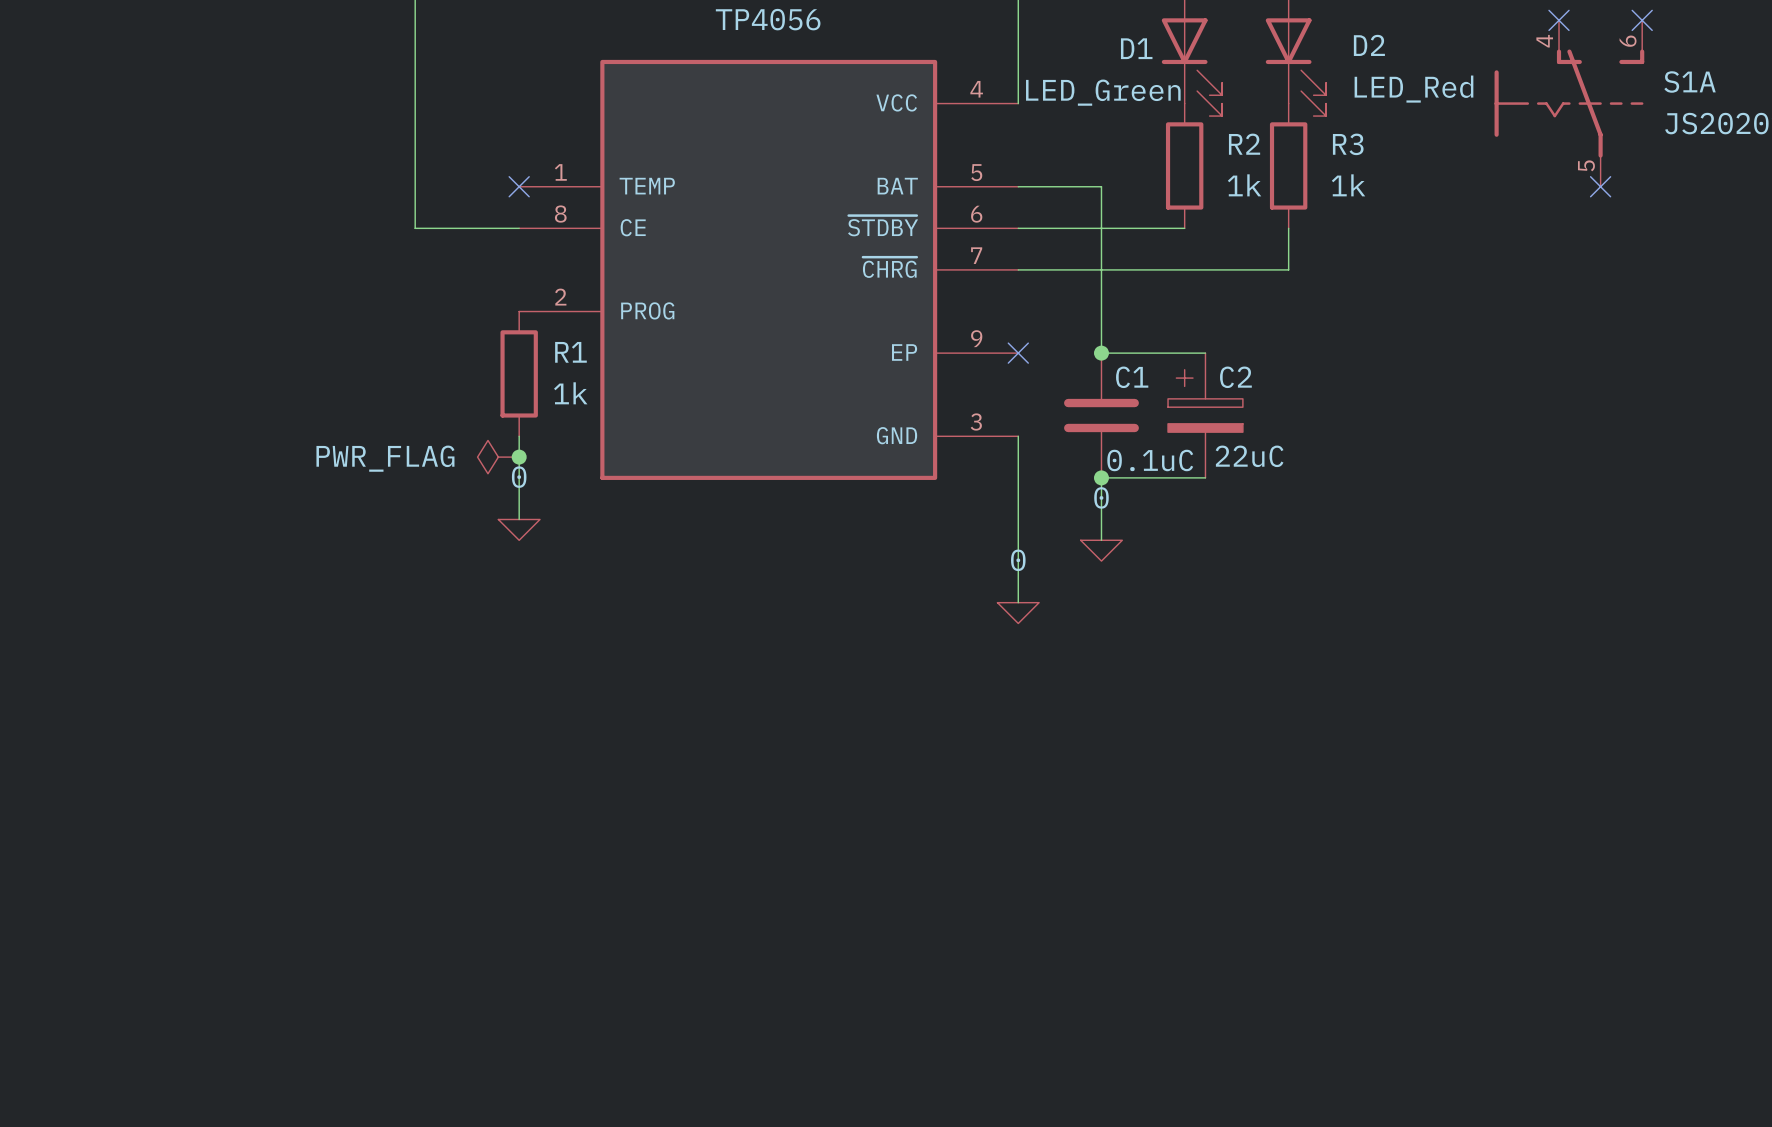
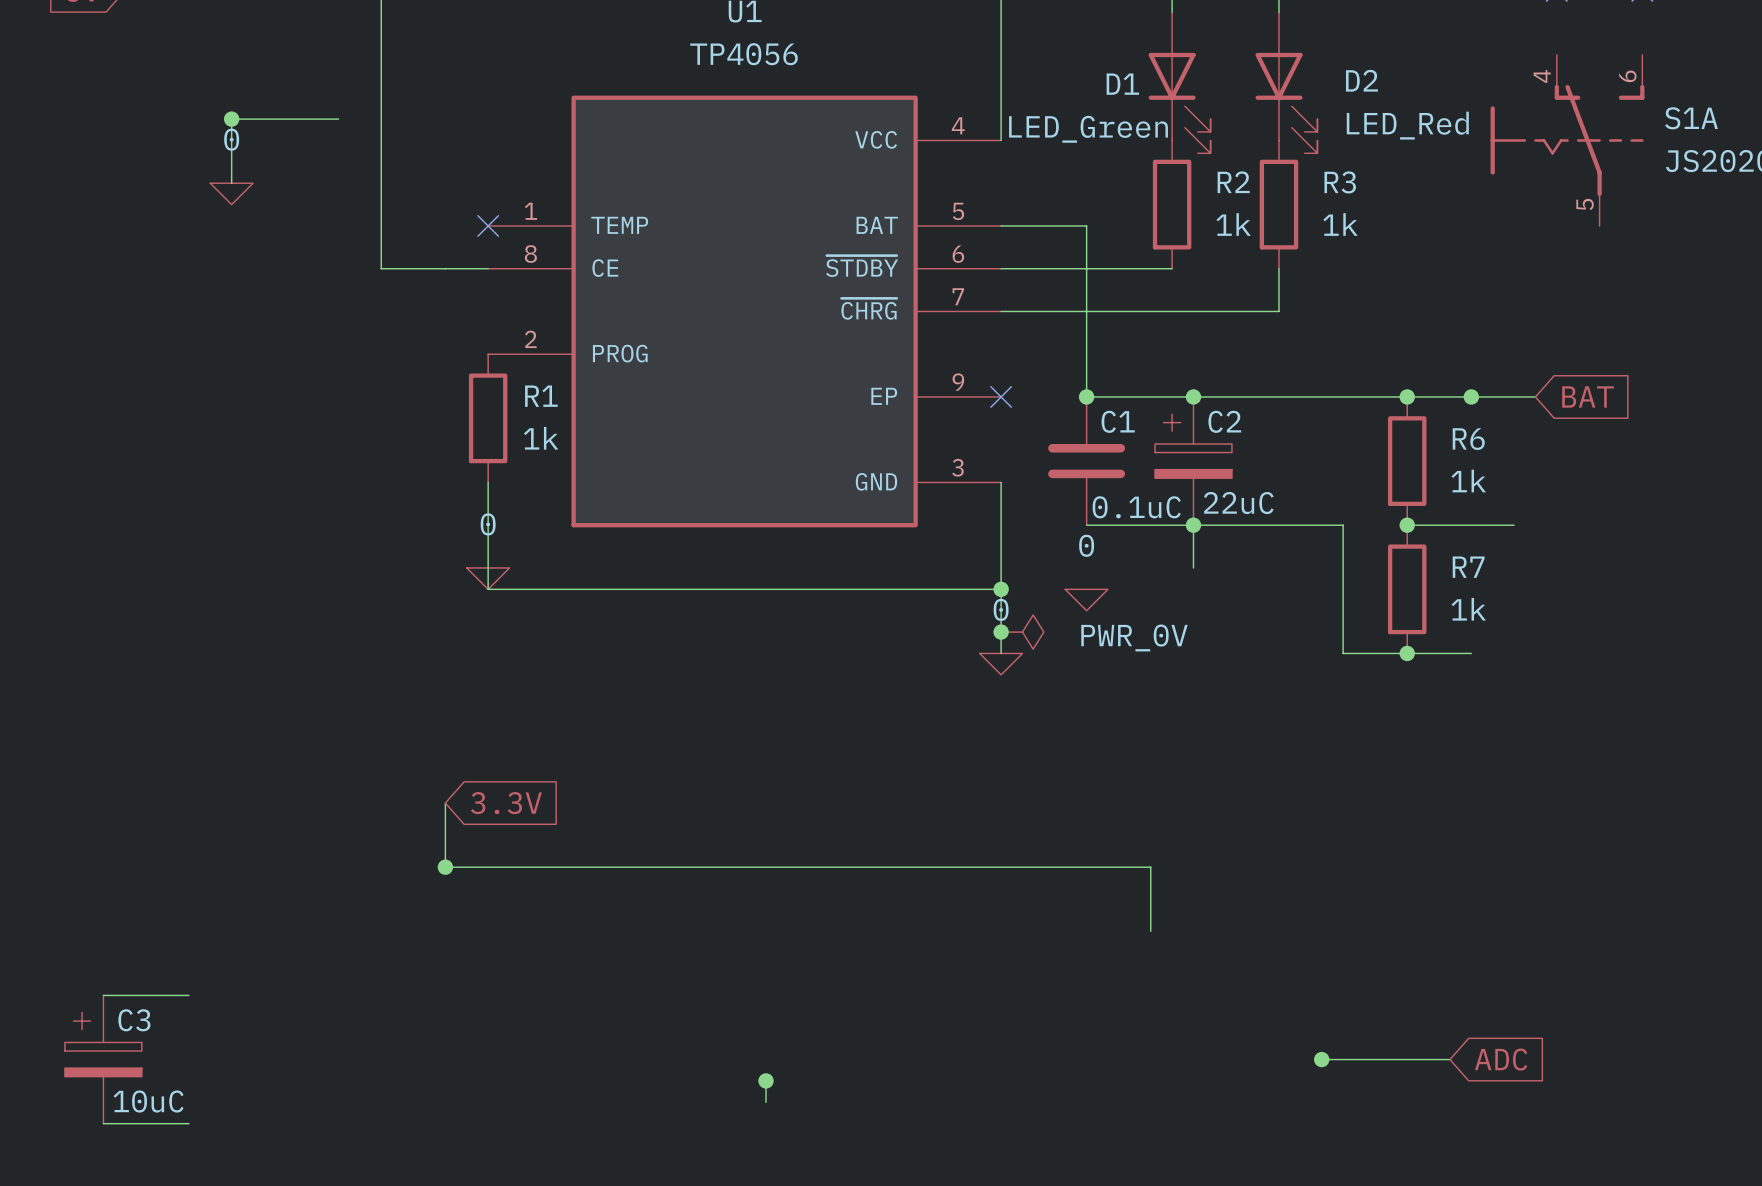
no-connect mark: (1559, 20) -> none
no-connect mark: (1642, 20) -> none
junction: none -> (231, 119)
wire: none -> (338, 119) (231, 119) (231, 183)
power symbol: none -> 0 (231, 193)
no-connect mark: (1600, 186) -> none
wire: none -> (1193, 396) (1535, 396)
junction: none -> (1193, 396)
junction: none -> (1407, 396)
junction: none -> (1471, 396)
global label: none -> BAT (1588, 396)
R6: none -> 1k (1407, 461)
power symbol: PWR_FLAG (498, 457) -> none
junction: (519, 457) -> none
wire: (1101, 477) (1101, 540) -> none
junction: (1101, 477) -> none
junction: none -> (1193, 525)
wire: none -> (1407, 525) (1514, 525)
junction: none -> (1407, 525)
wire: none -> (488, 567) (488, 589) (1001, 589)
wire: none -> (1193, 567) (1193, 525) (1343, 525) (1343, 653) (1471, 653)
junction: none -> (1001, 589)
R7: none -> 1k (1407, 589)
junction: none -> (1001, 632)
power symbol: none -> PWR_0V (1022, 632)
junction: none -> (1407, 653)
wire: none -> (445, 803) (445, 867) (1150, 867) (1150, 931)
global label: none -> 3.3V (506, 803)
junction: none -> (445, 867)
wire: none -> (103, 995) (188, 995)
C3: none -> 10uC (103, 1059)
wire: none -> (1321, 1059) (1449, 1059)
junction: none -> (1321, 1059)
global label: none -> ADC (1501, 1059)
wire: none -> (766, 1080) (766, 1102)
junction: none -> (766, 1080)
wire: none -> (103, 1123) (188, 1123)

